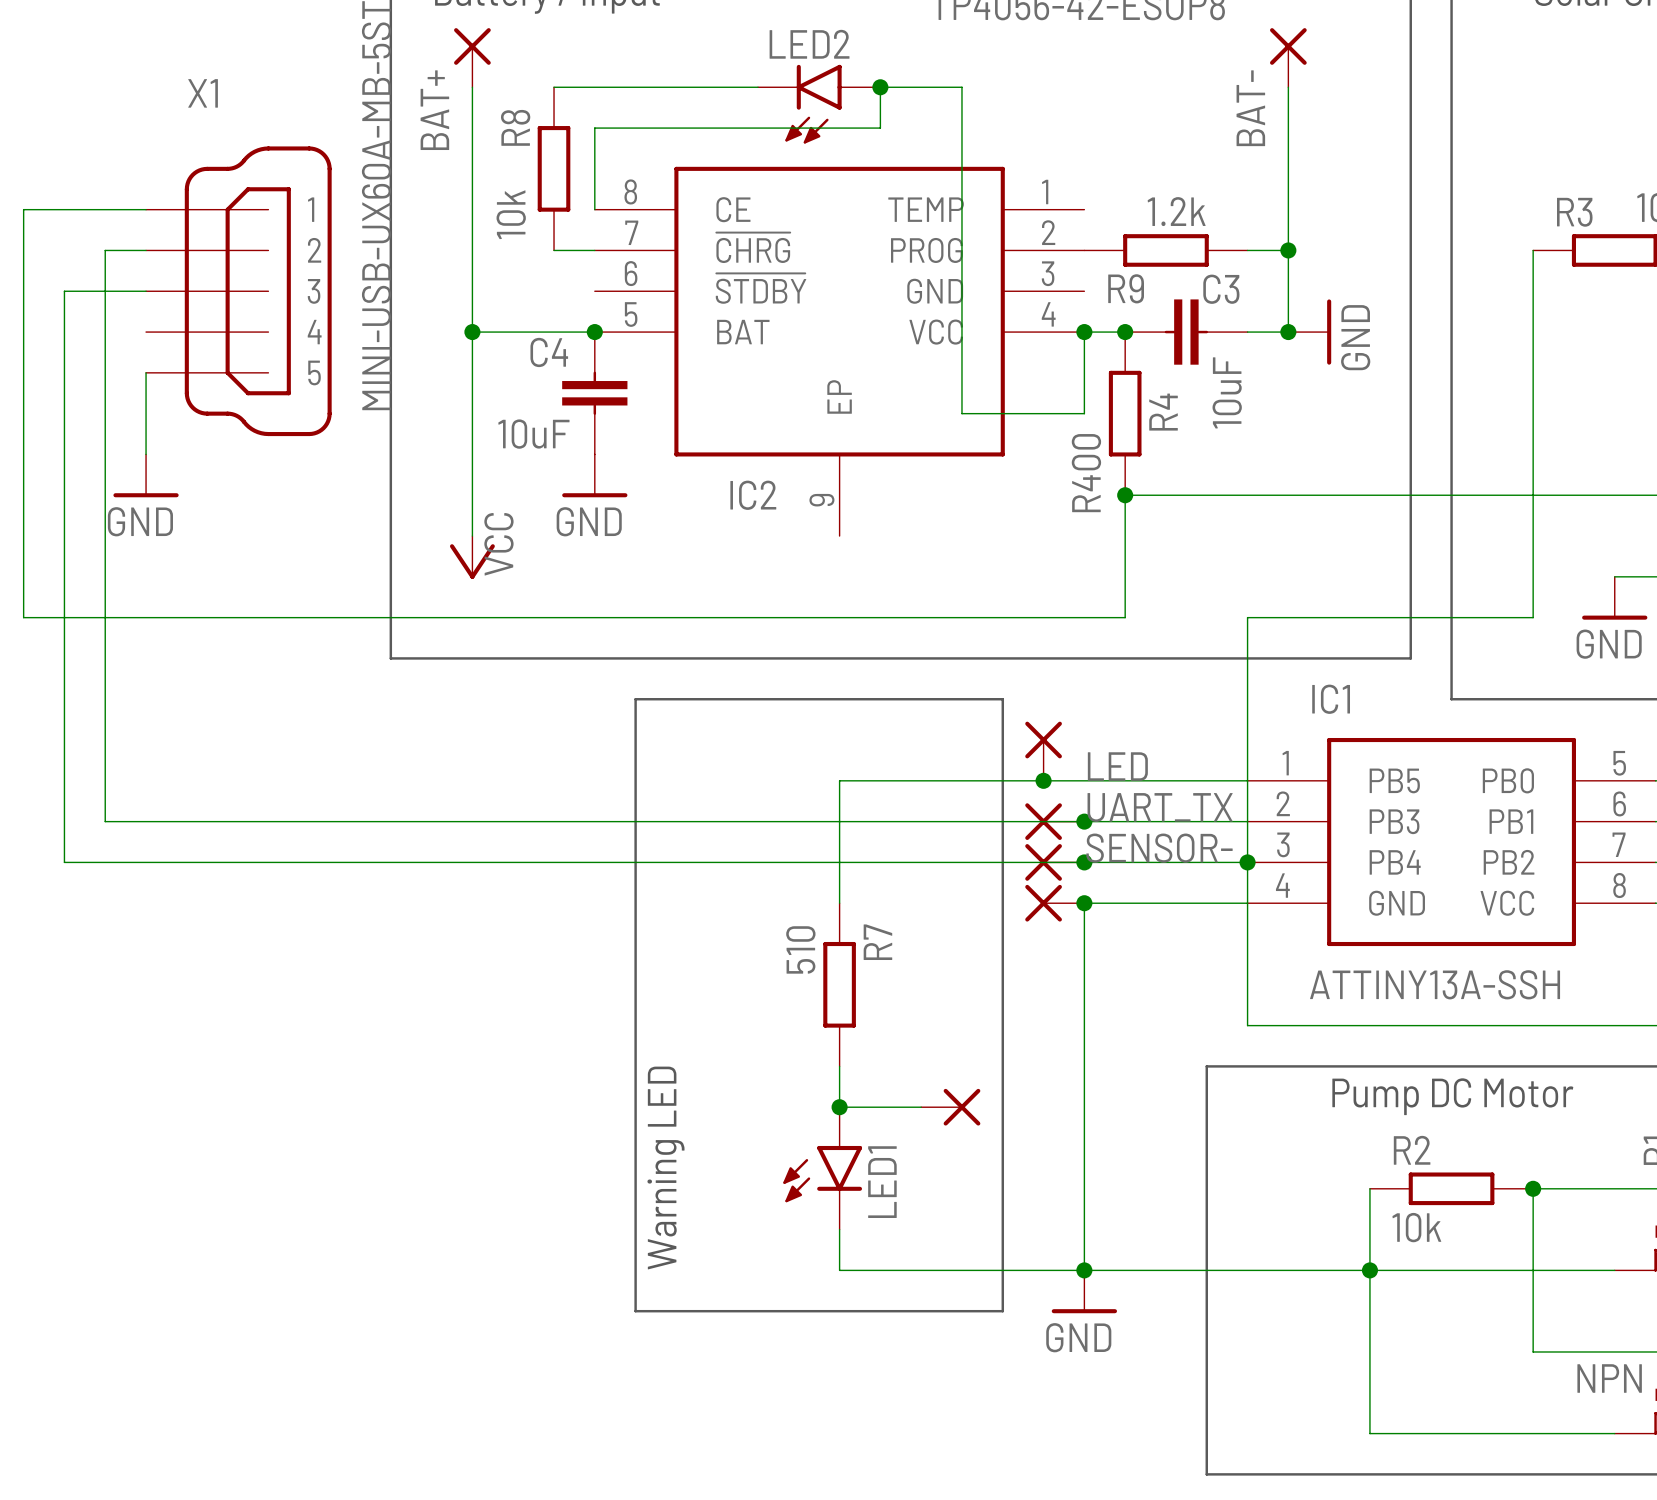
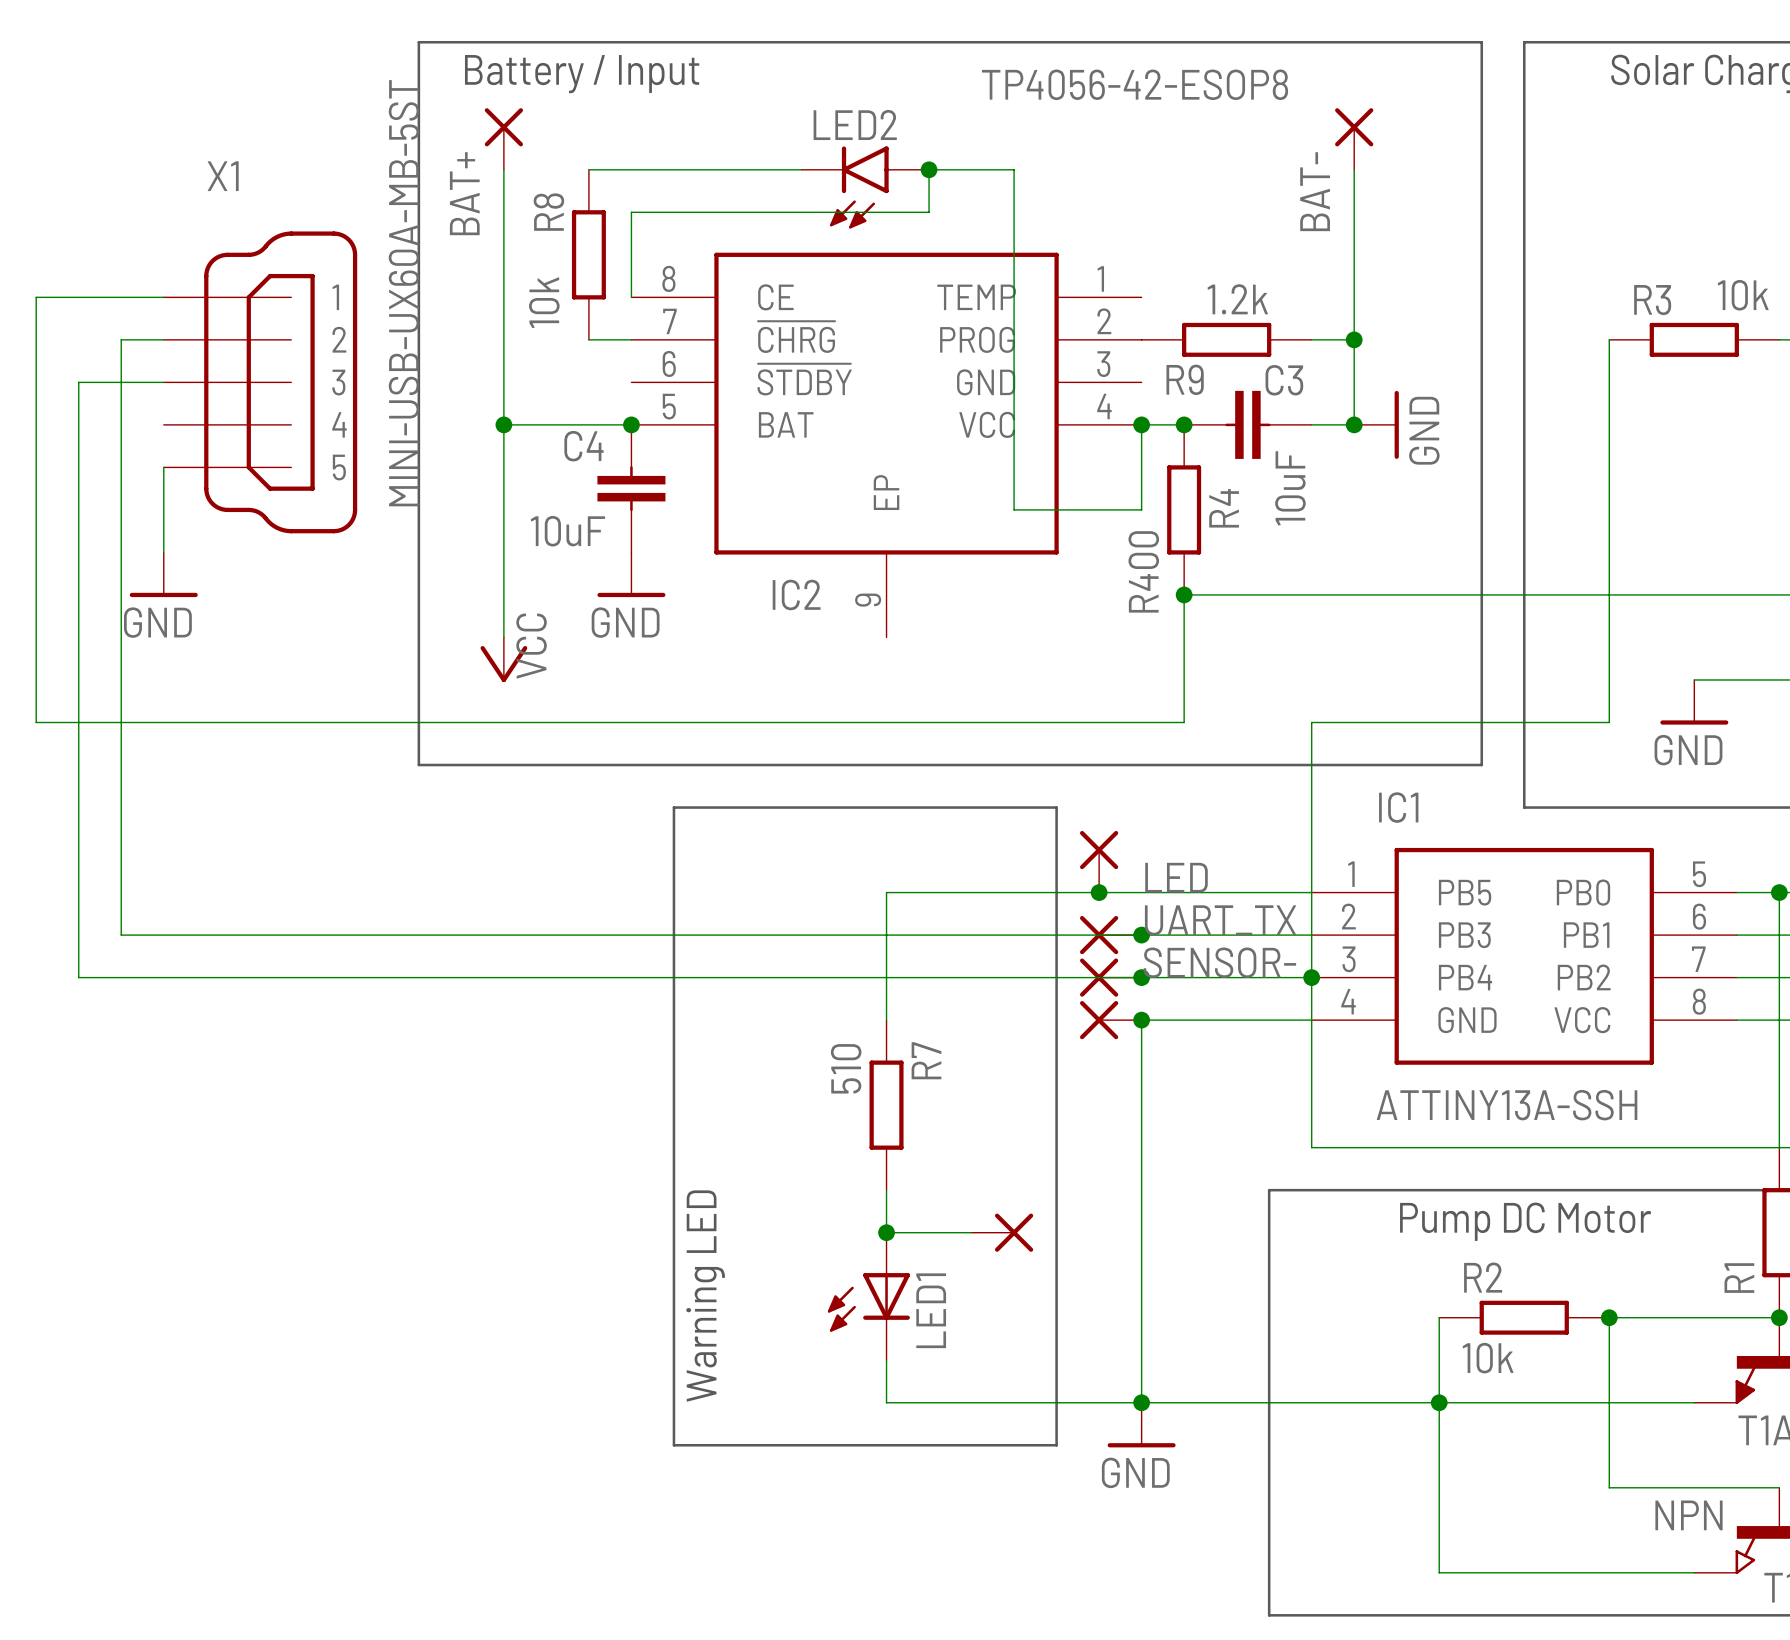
LED1 symbol: [783, 1107, 863, 1230] -> [827, 1232, 910, 1361]

